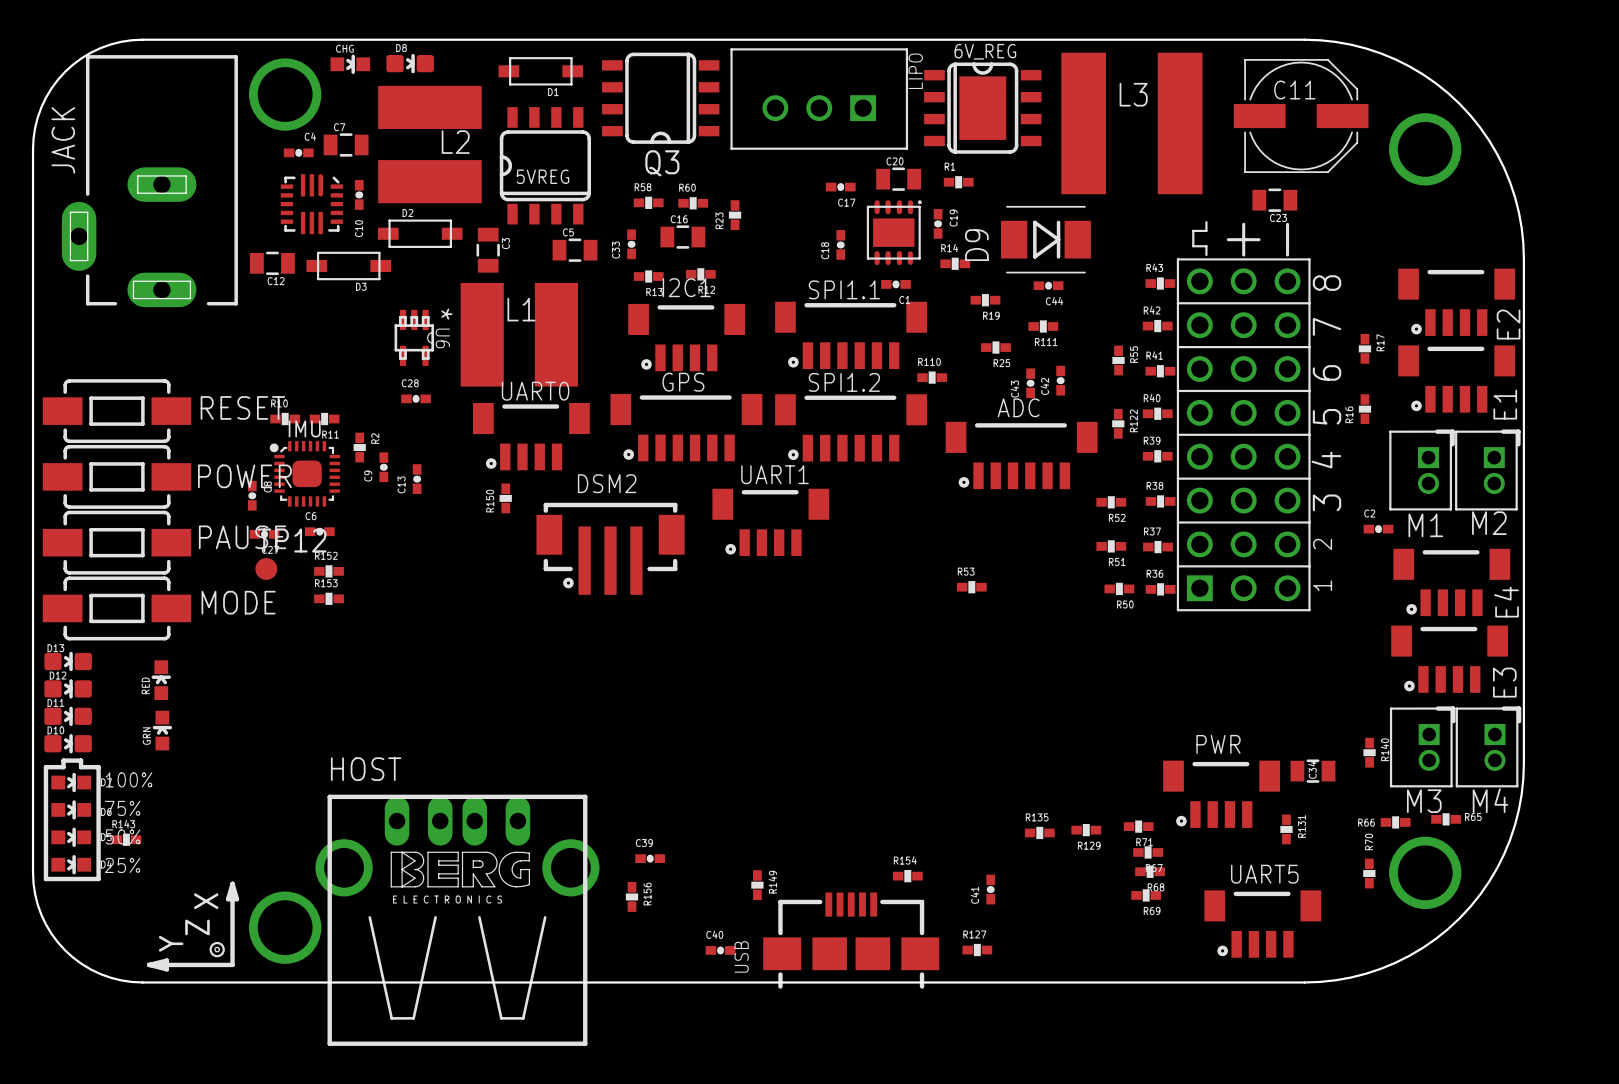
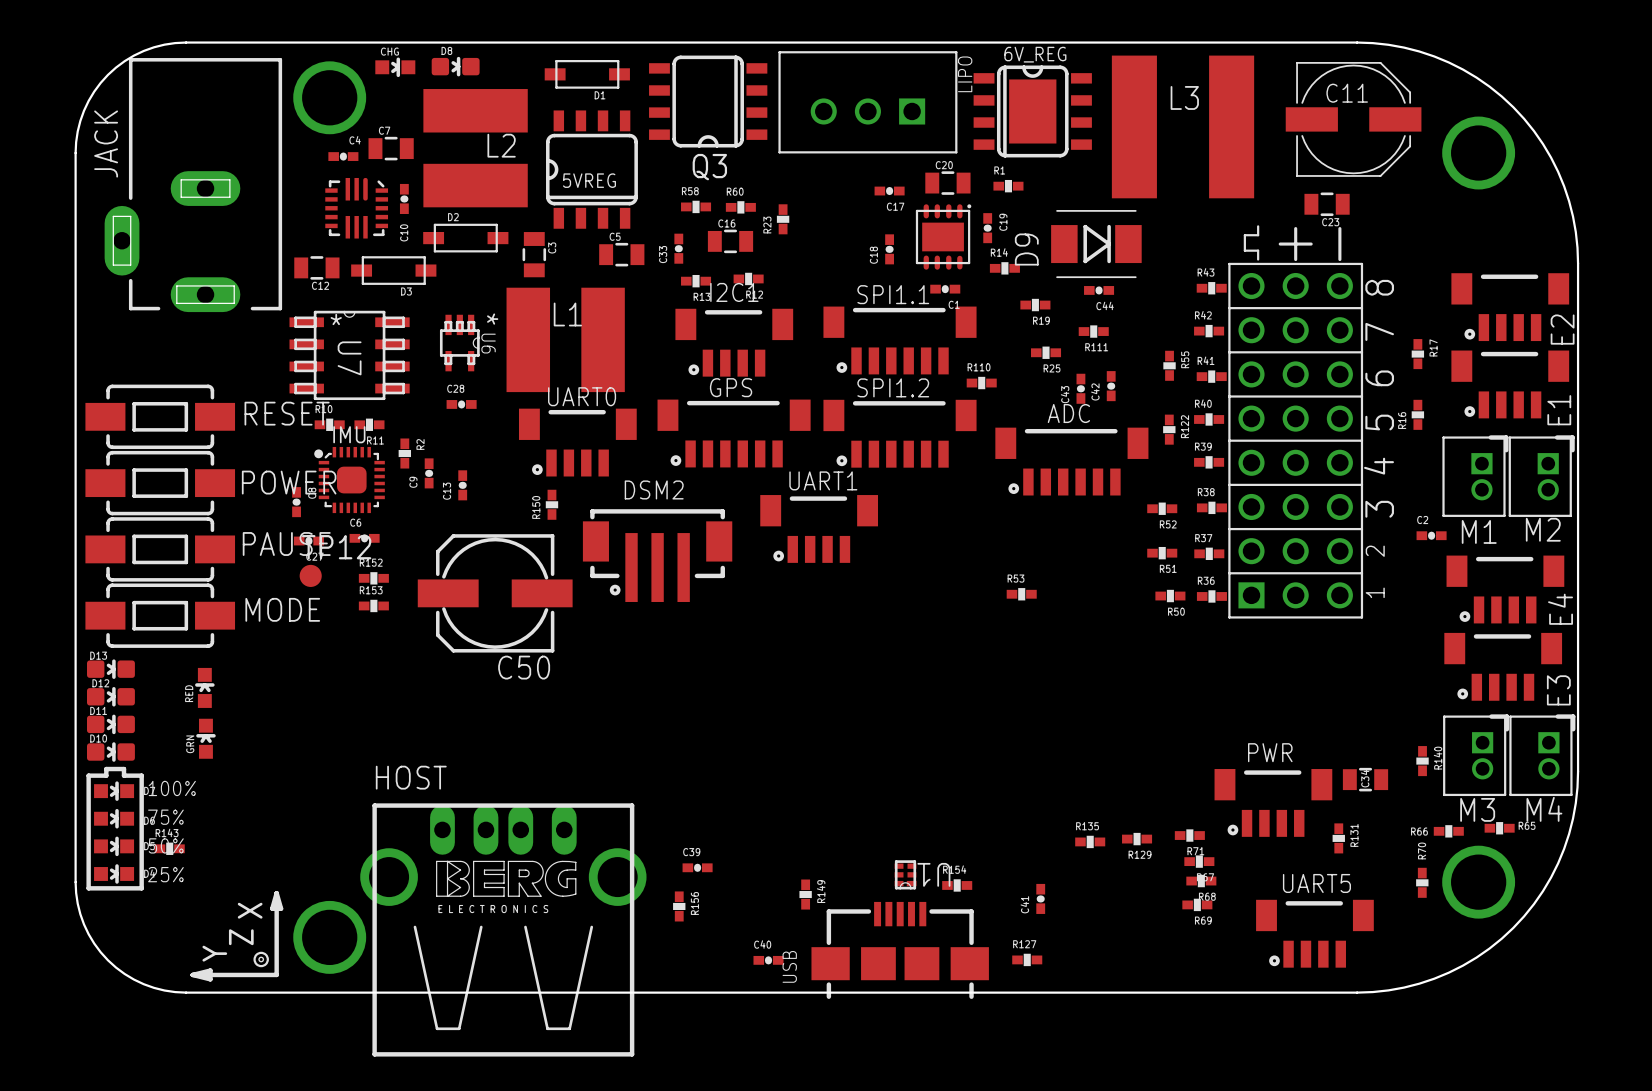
U7: none -> (349, 355)
C50: none -> (495, 593)
U1: none -> (905, 874)

